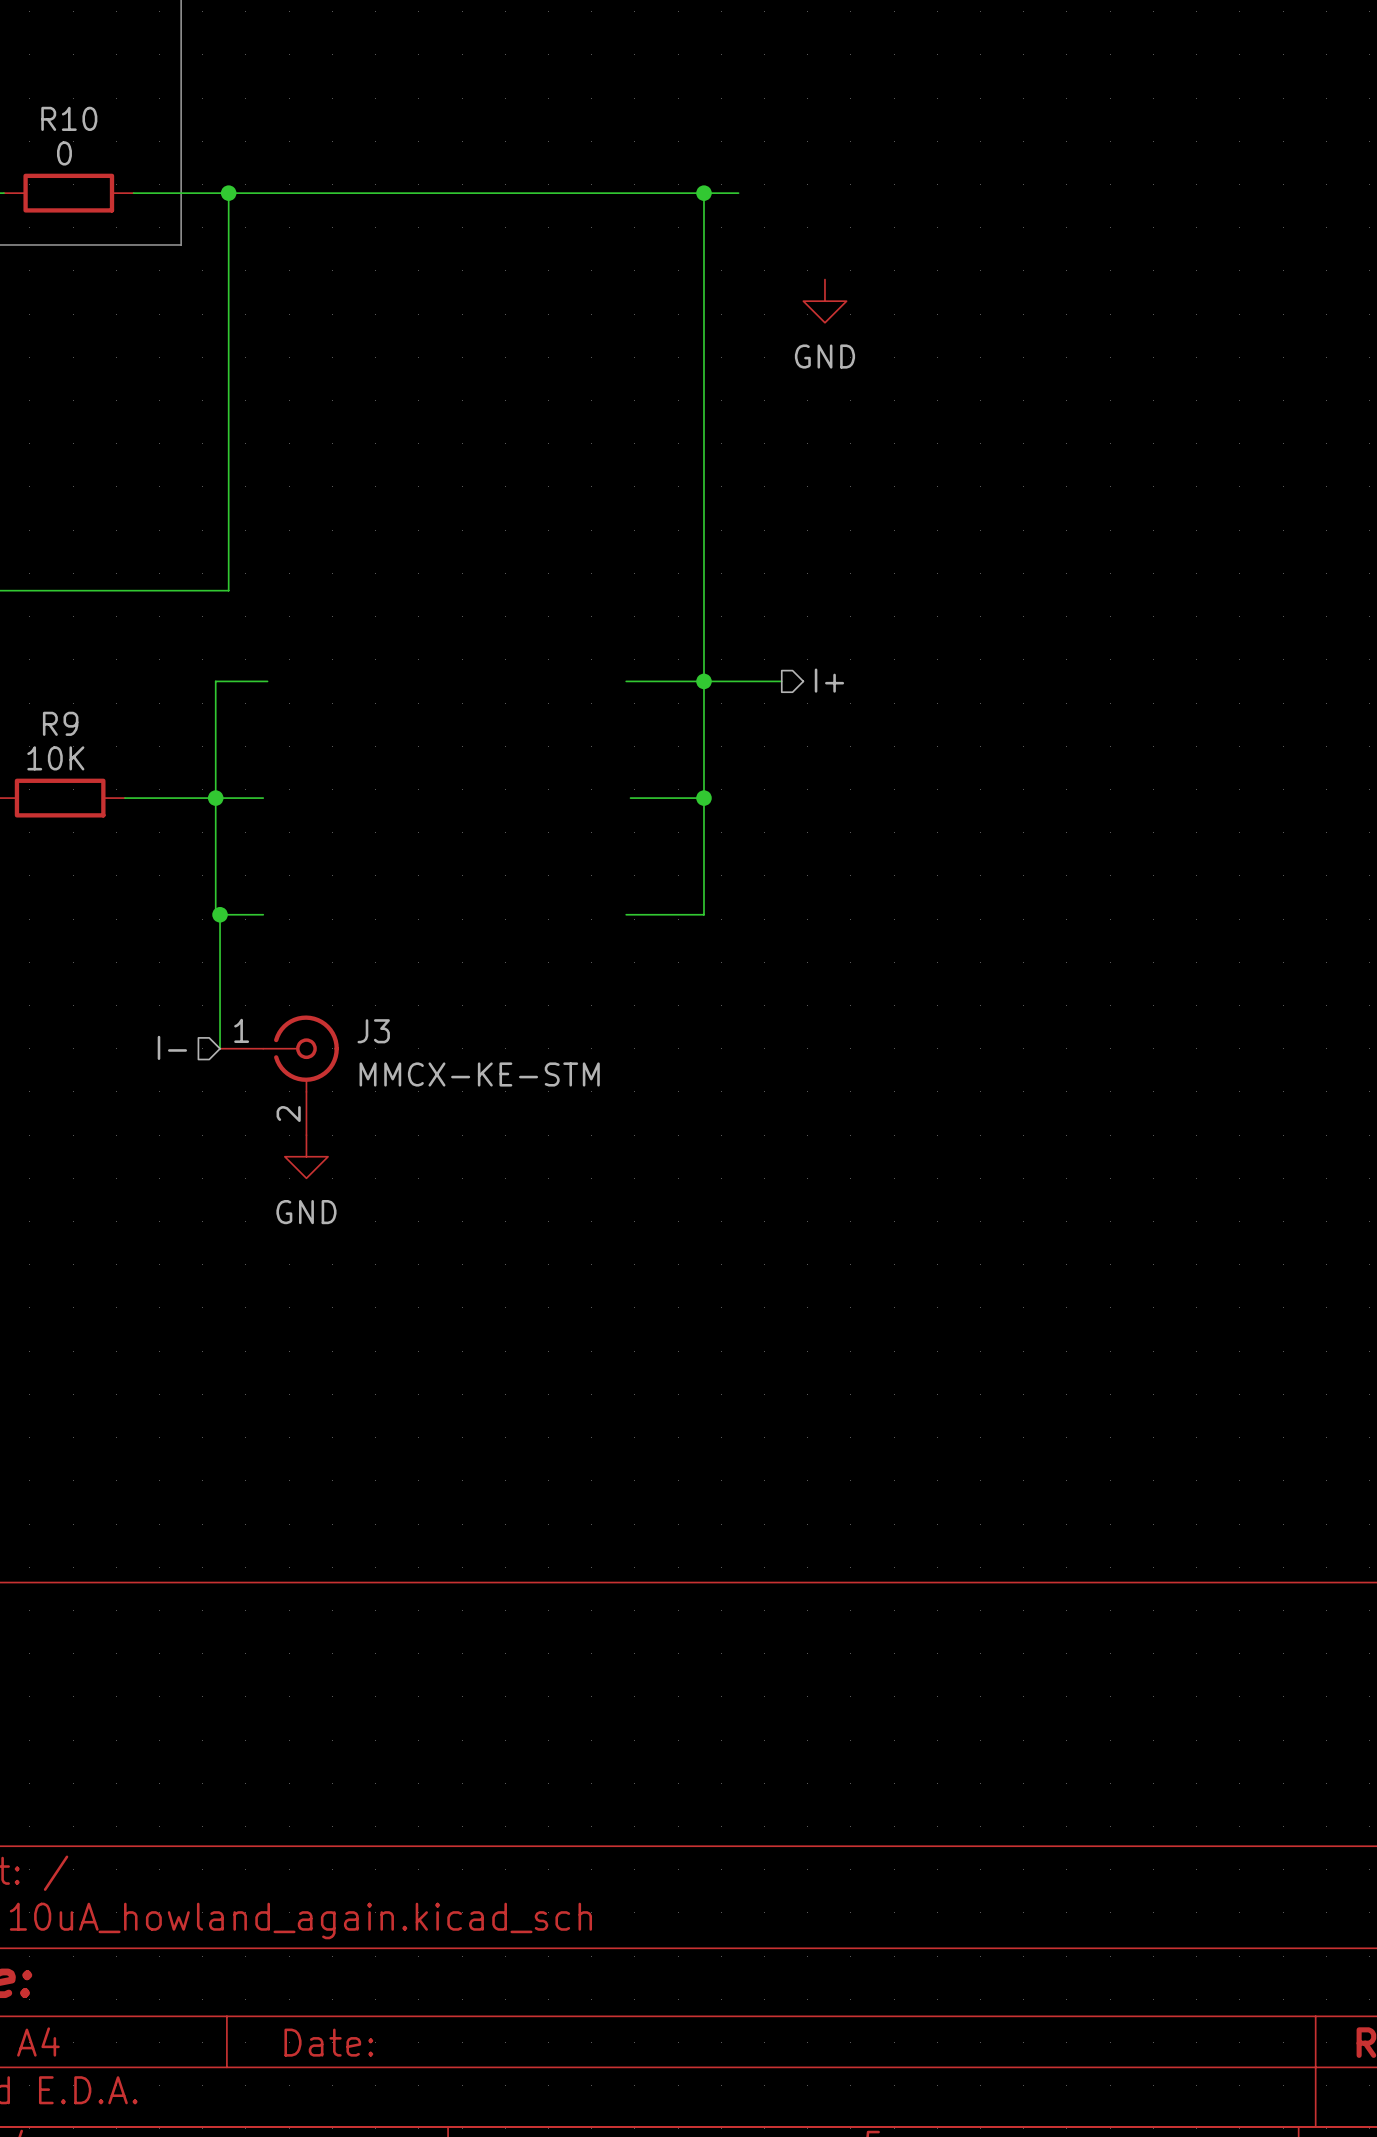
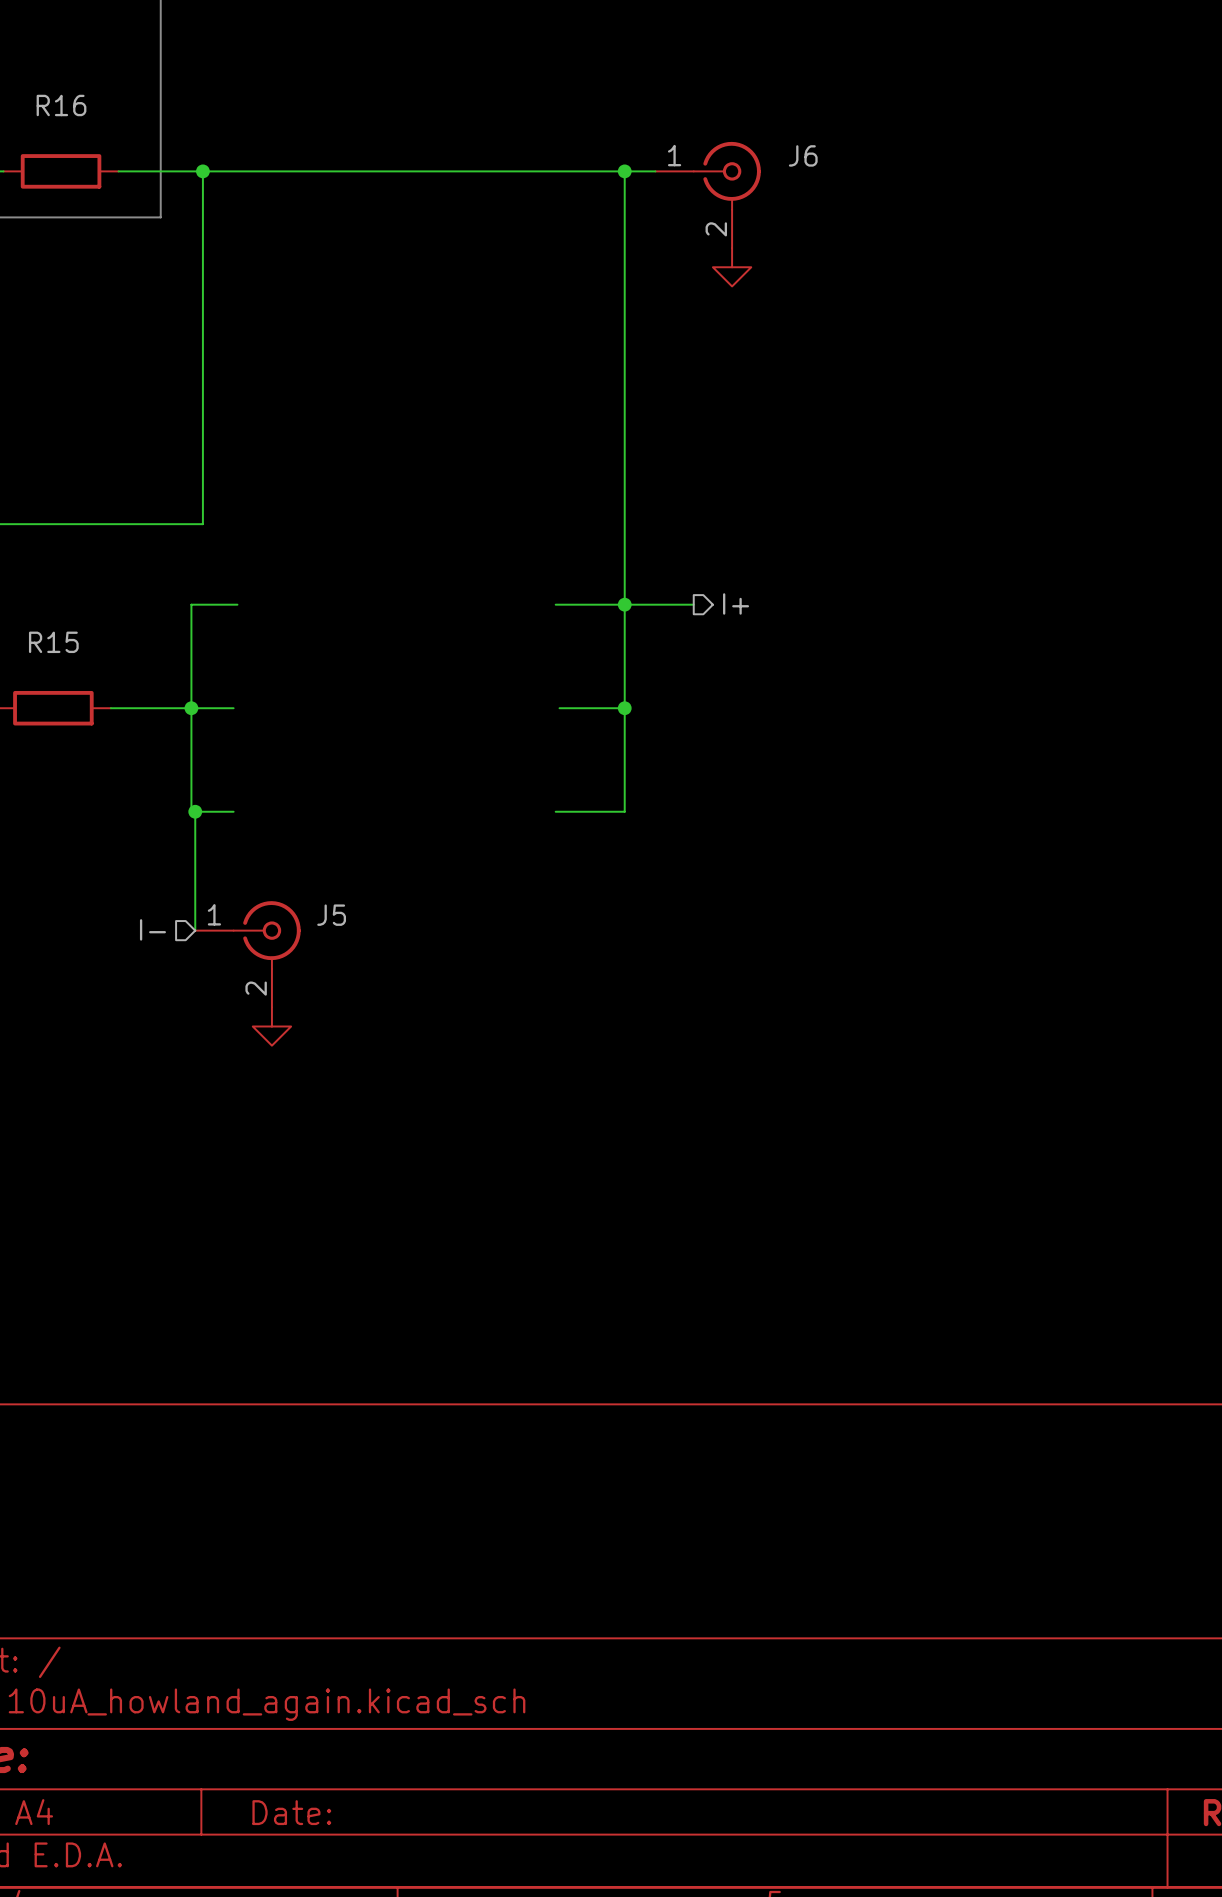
R10 name: R10 (69, 118) -> R16 (61, 105)
R10 value: 0 (64, 153) -> none
J6: none -> (708, 194)
power symbol text: GND (824, 356) -> none
R9 name: R9 (60, 723) -> R15 (53, 642)
R9 value: 10K (55, 758) -> none
J3 name: J3 (373, 1031) -> J5 (331, 915)
J3 value: MMCX-KE-STM (479, 1074) -> none
power symbol text: GND (306, 1212) -> none

